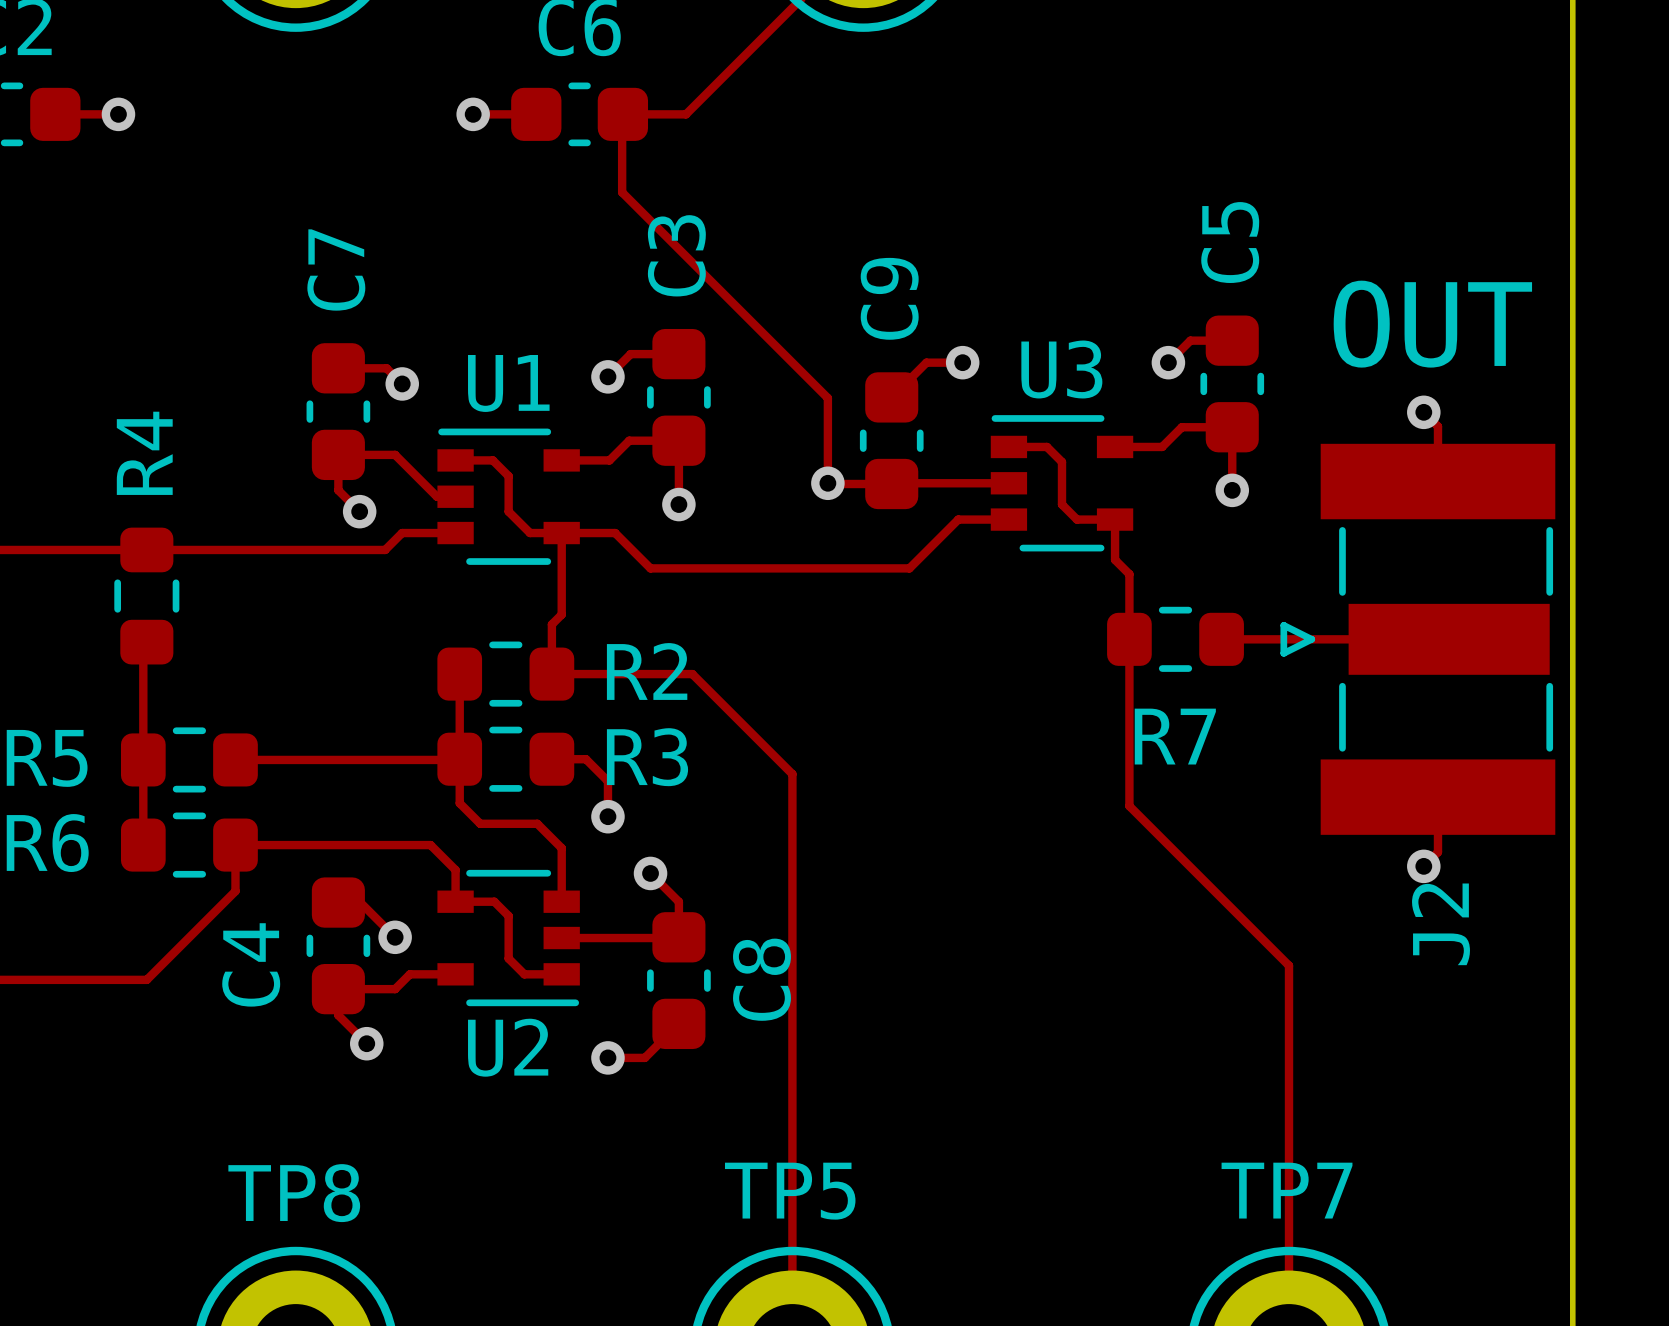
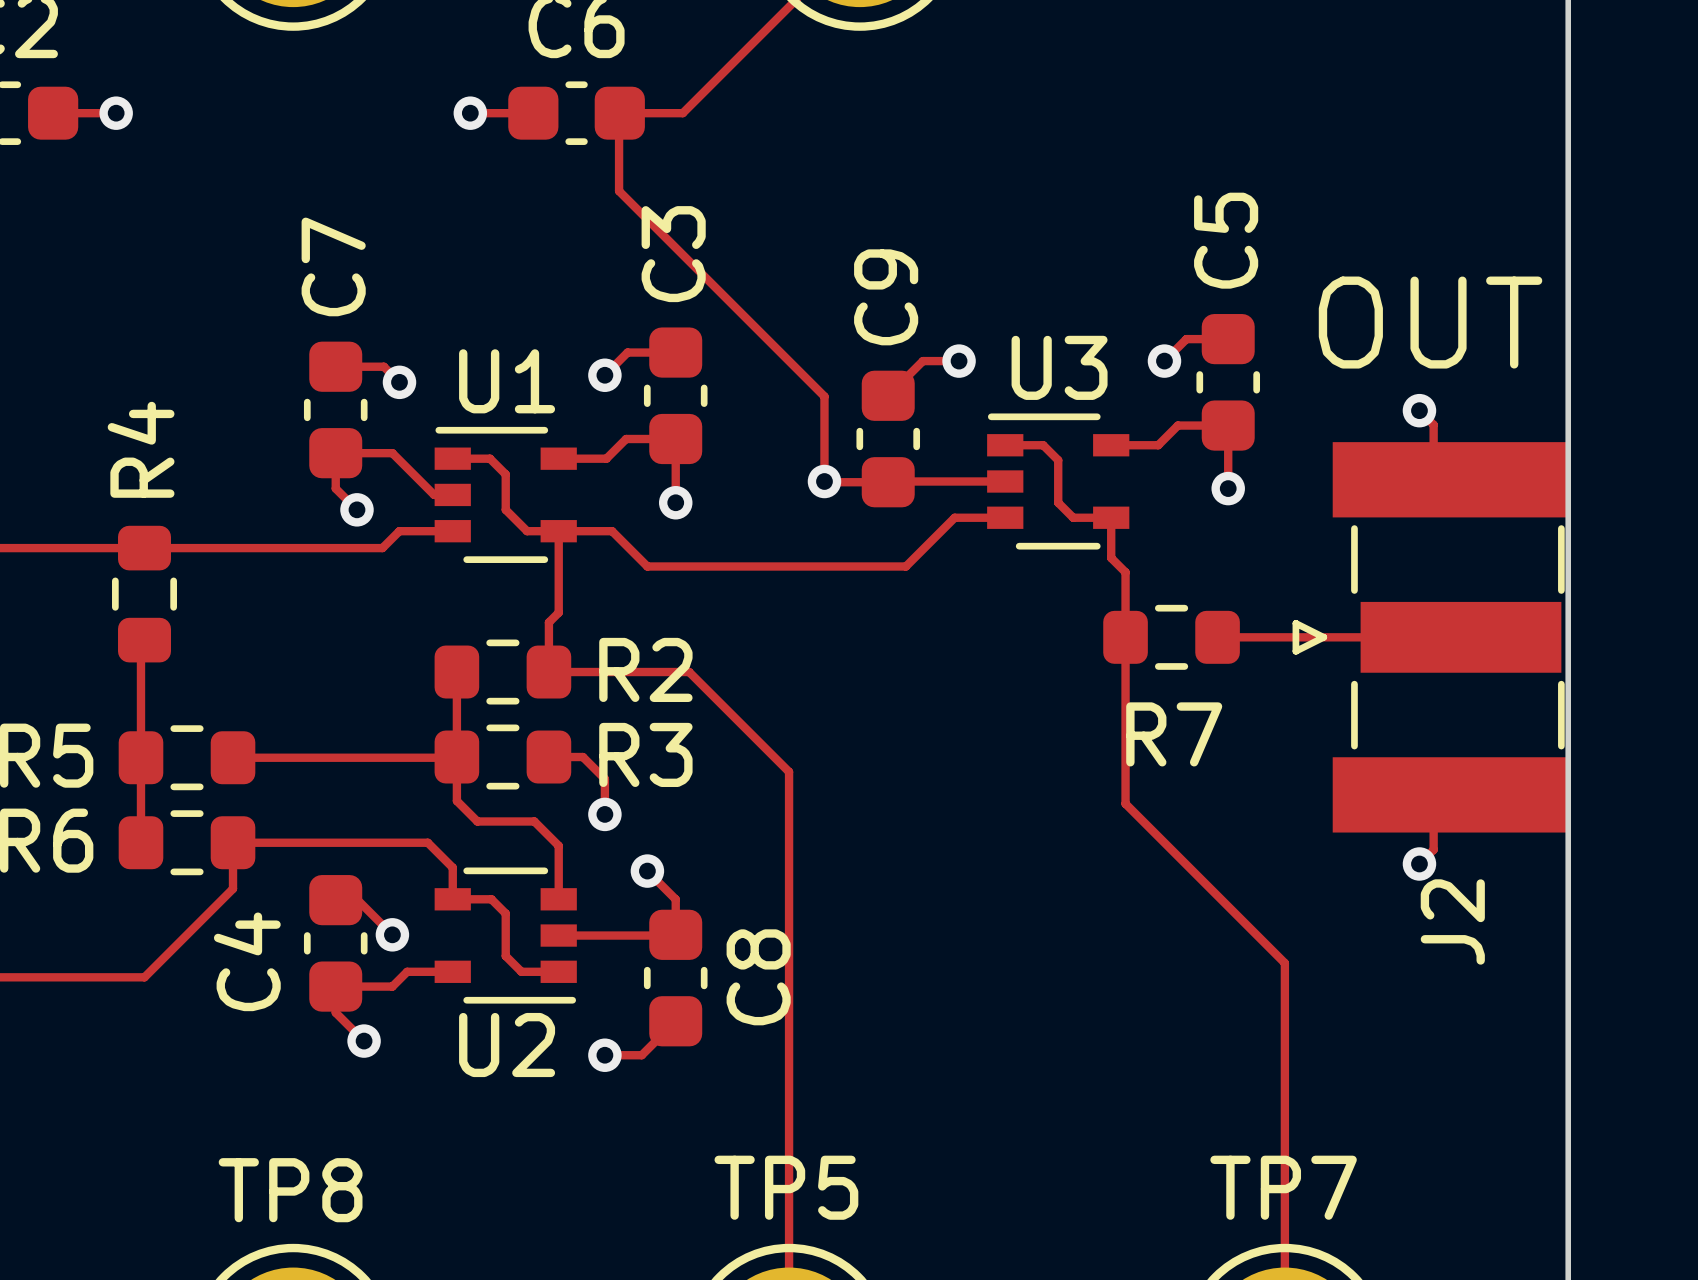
J2 position: (1417, 639) -> (1429, 637)

